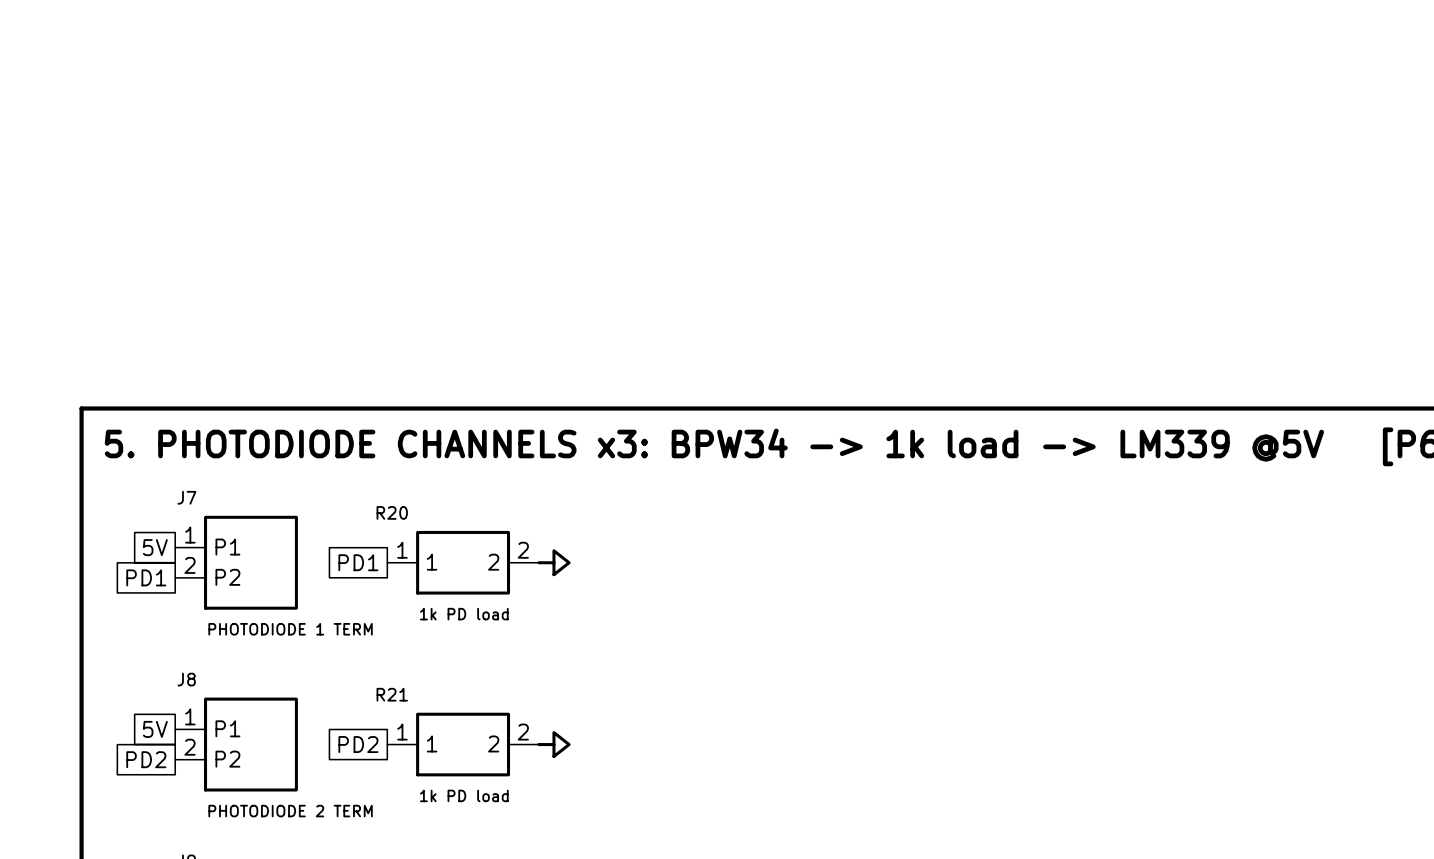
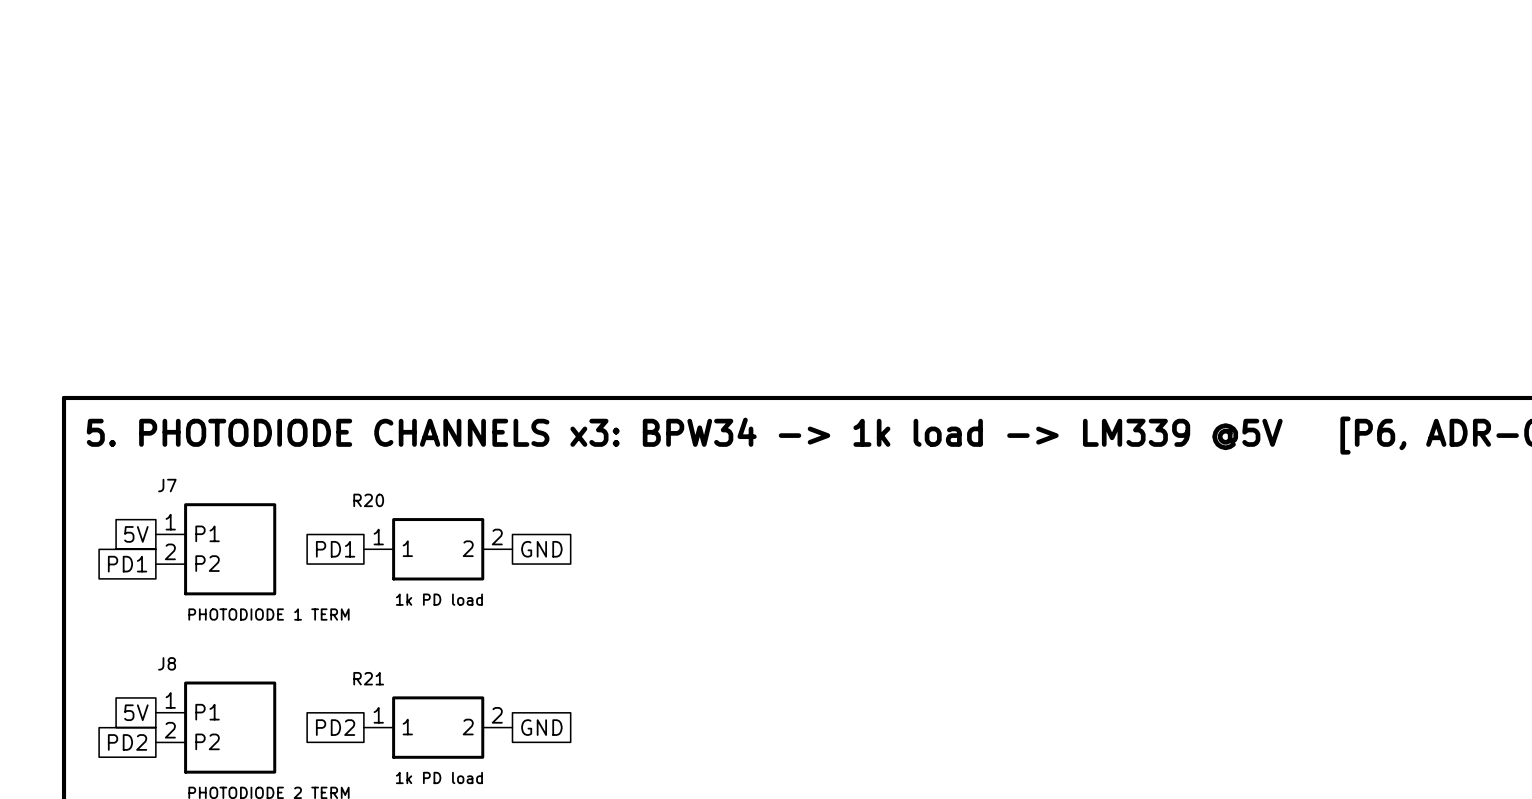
power symbol: (553, 562) -> none
global label: none -> GND (541, 549)
power symbol: (553, 744) -> none
global label: none -> GND (541, 727)

